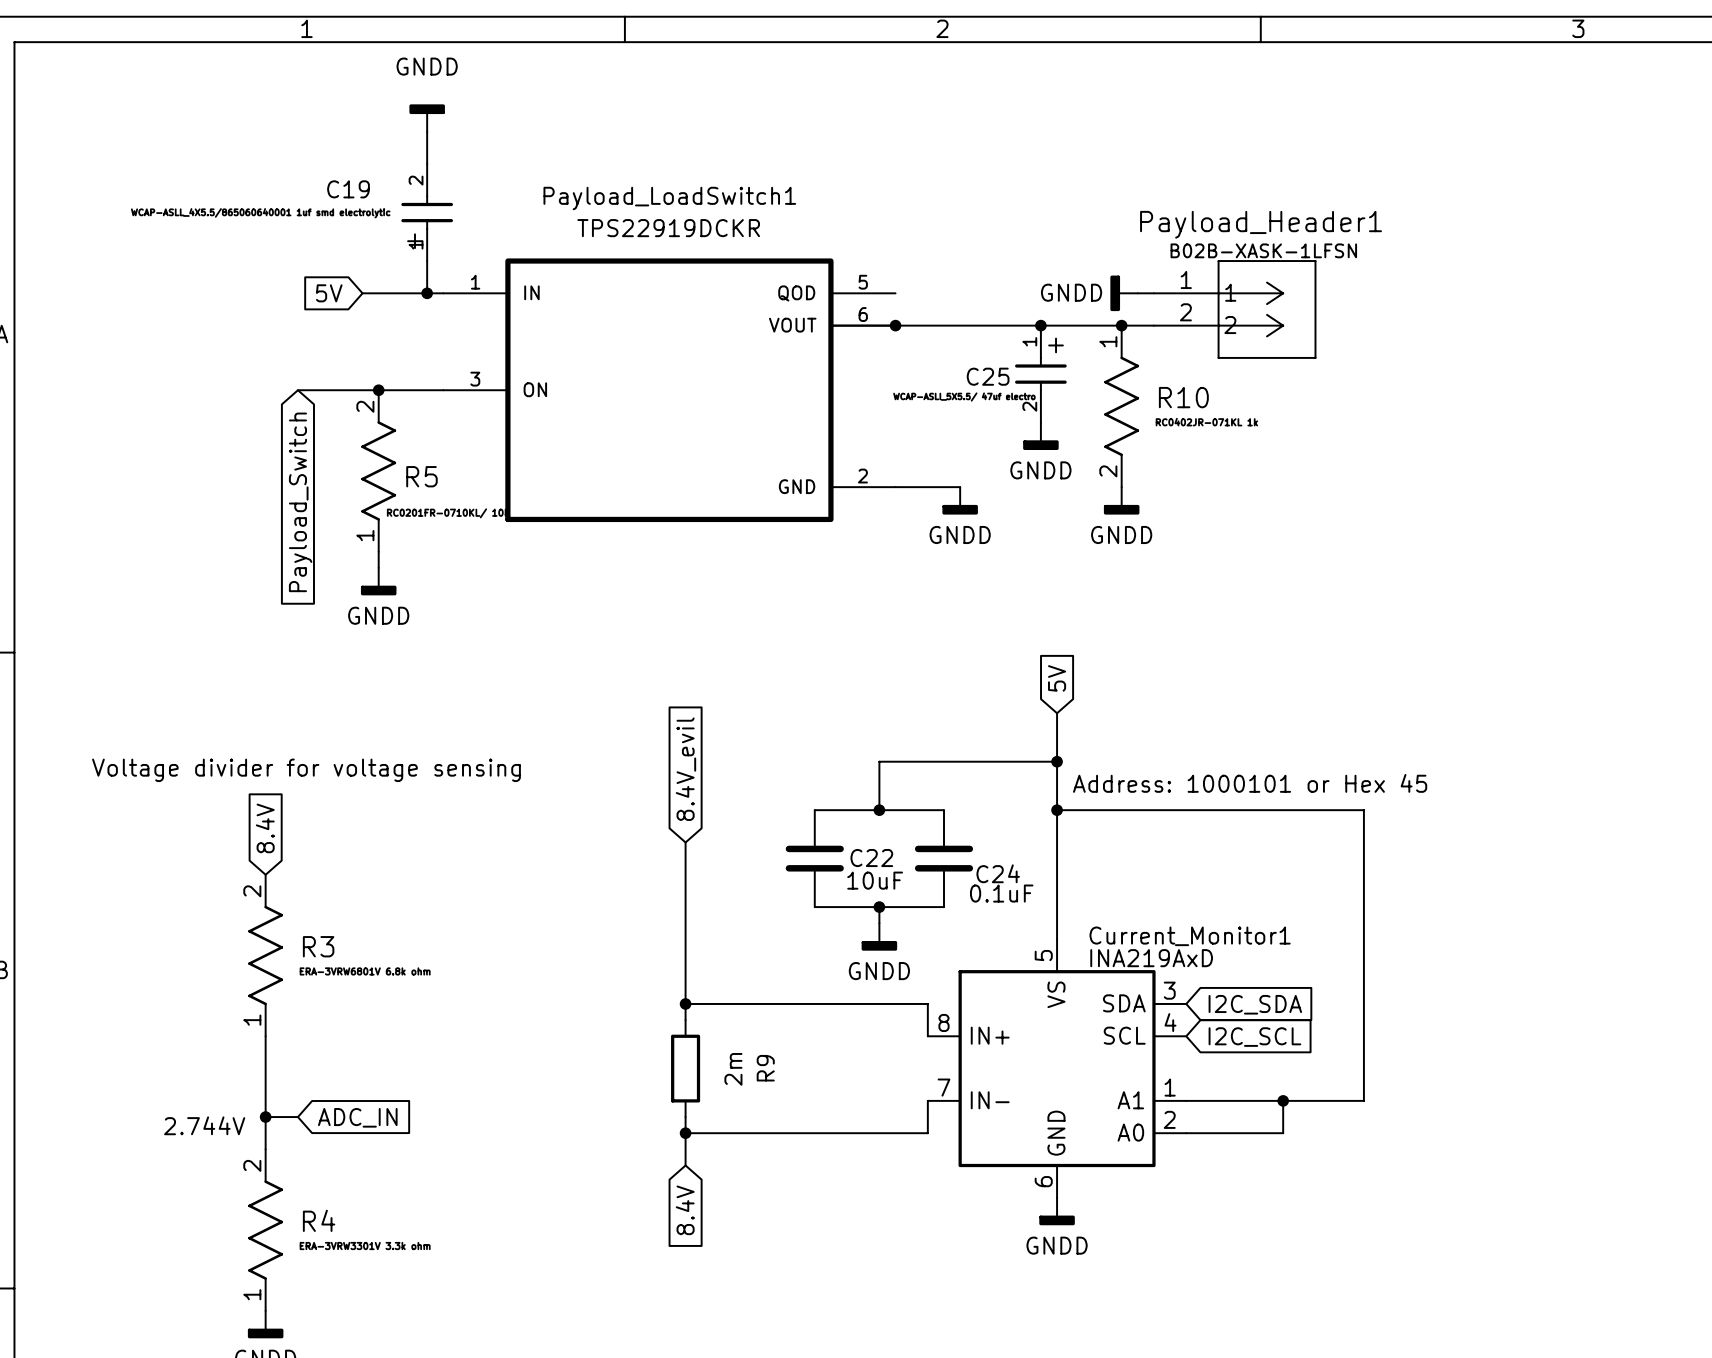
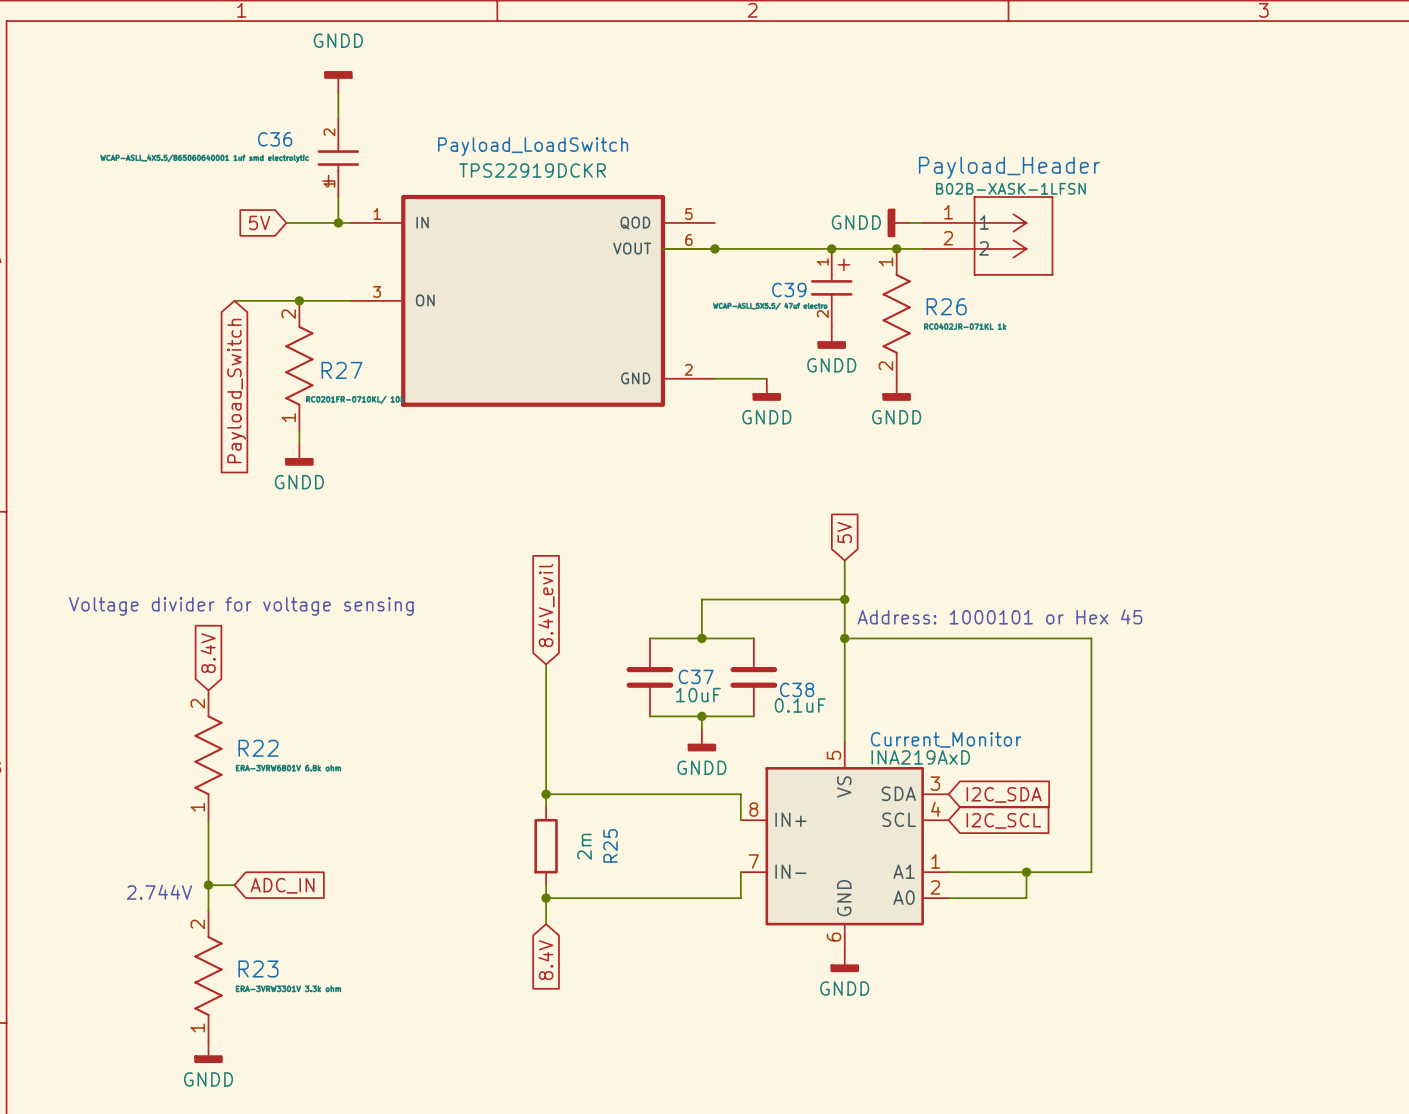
C19 name: C19 (348, 189) -> C36 (275, 139)
Payload_LoadSwitch1 name: Payload_LoadSwitch1 (669, 198) -> Payload_LoadSwitch (533, 146)
Payload_Header1 name: Payload_Header1 (1261, 224) -> Payload_Header (1009, 167)
C25 name: C25 (988, 376) -> C39 (789, 289)
R10 name: R10 (1183, 397) -> R26 (946, 306)
R5 name: R5 (421, 476) -> R27 (341, 370)
C22 name: C22 (871, 858) -> C37 (696, 676)
C24 name: C24 (998, 873) -> C38 (797, 689)
Current_Monitor1 name: Current_Monitor1 (1190, 936) -> Current_Monitor (946, 739)
R3 name: R3 (318, 946) -> R22 (258, 748)
R9 name: R9 (765, 1068) -> R25 (610, 845)
R4 name: R4 (319, 1220) -> R23 (258, 968)

